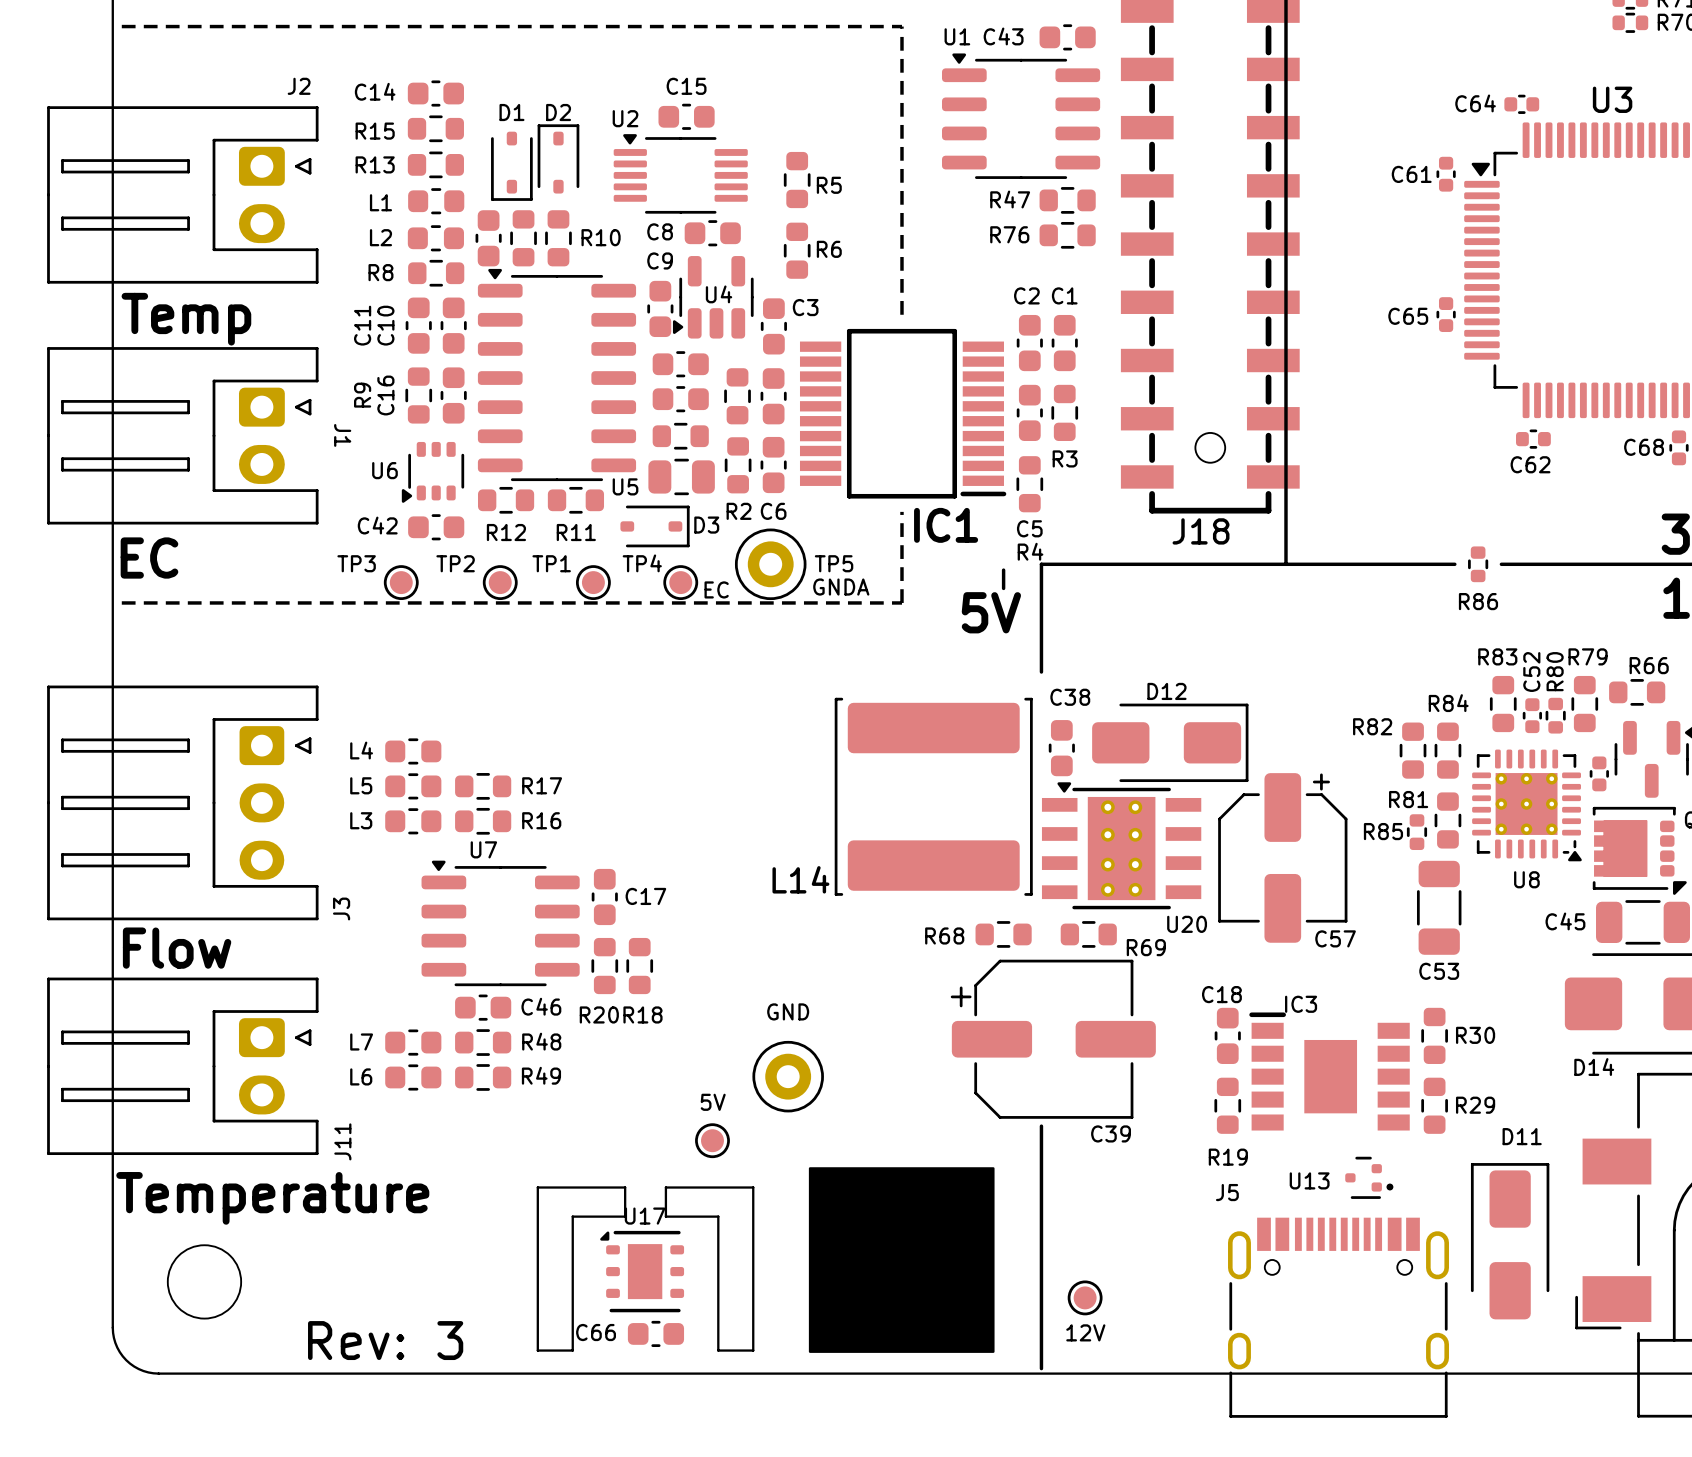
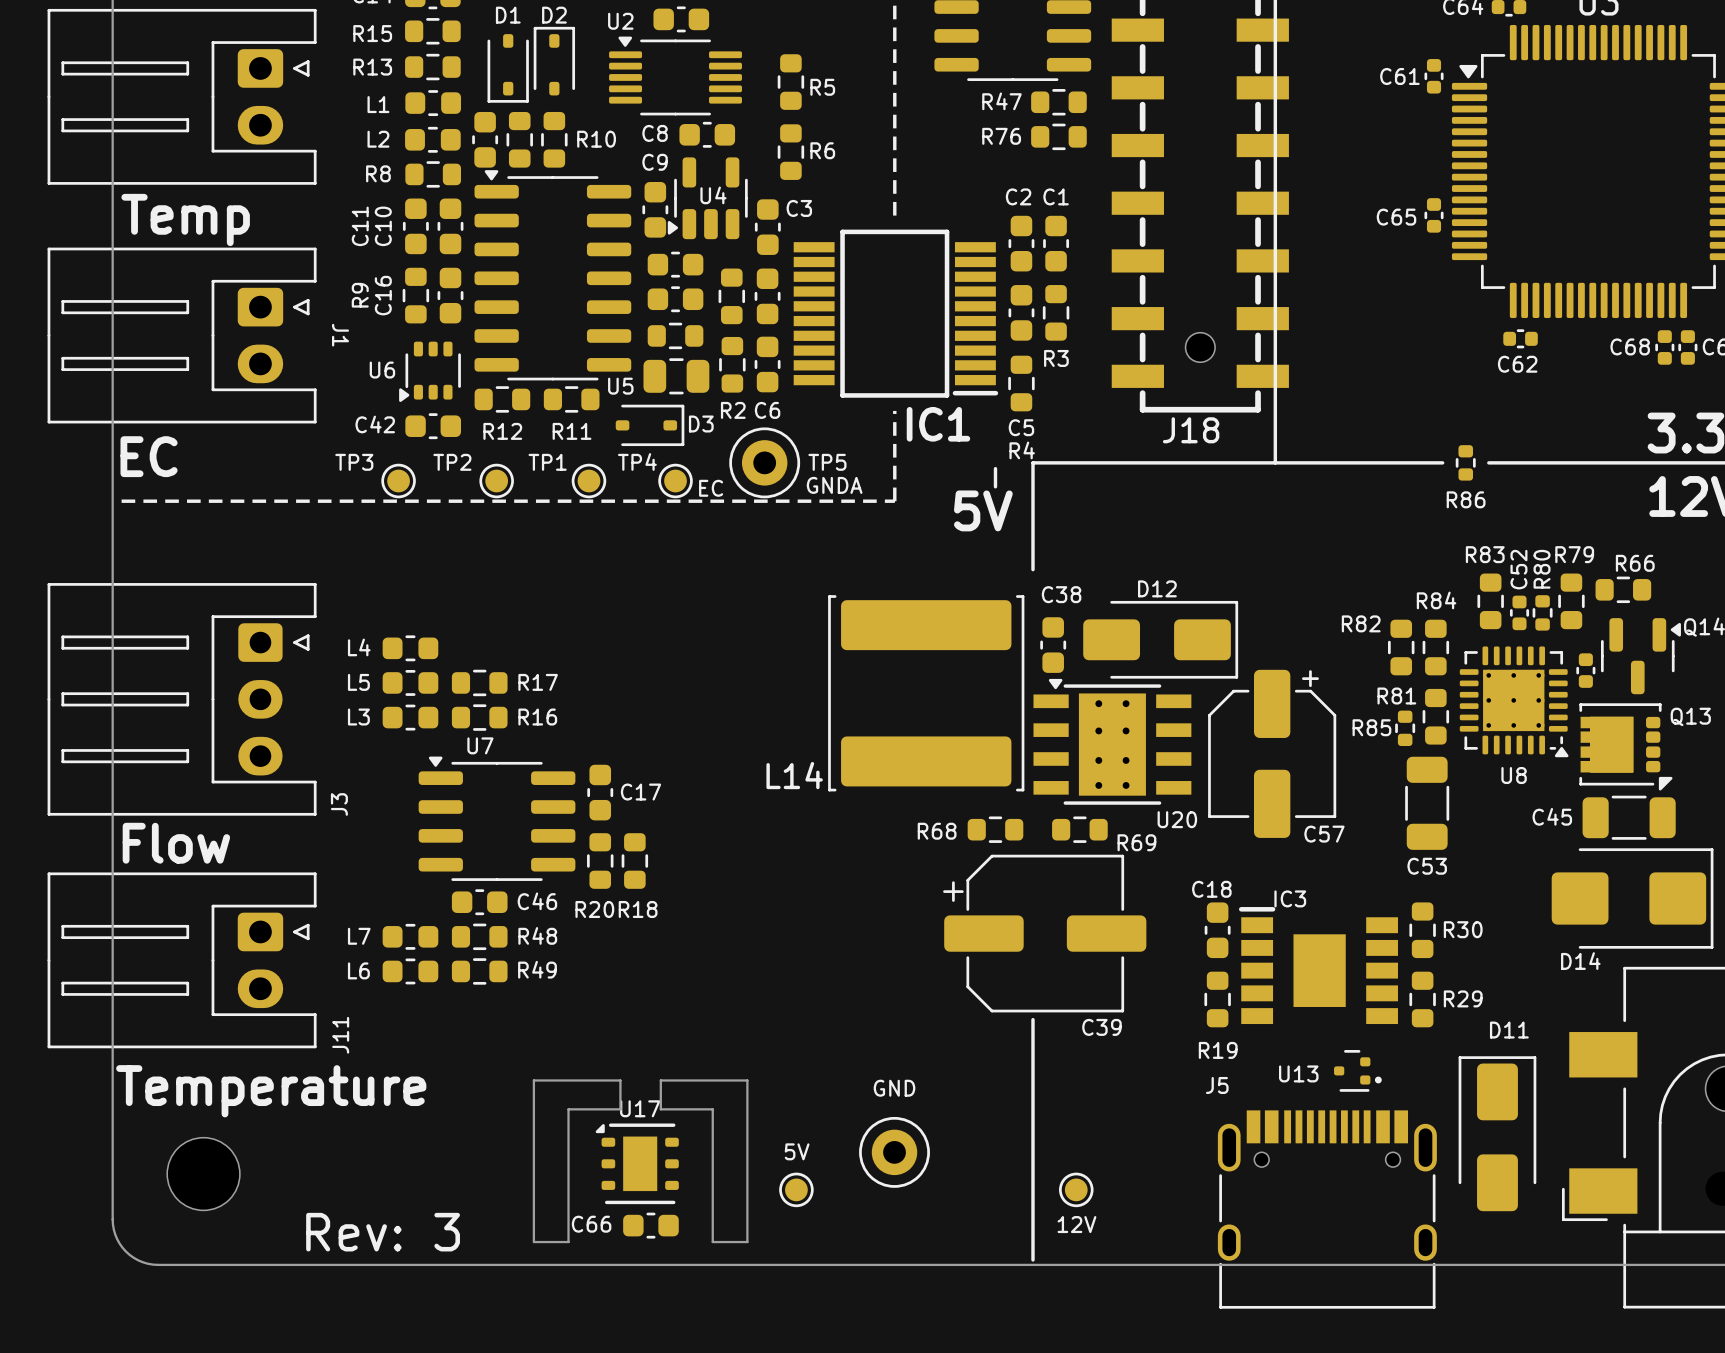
part position: (788, 1076) -> (894, 1152)
part position: (712, 1140) -> (796, 1189)
drawing: [808, 1167, 995, 1353] -> none

